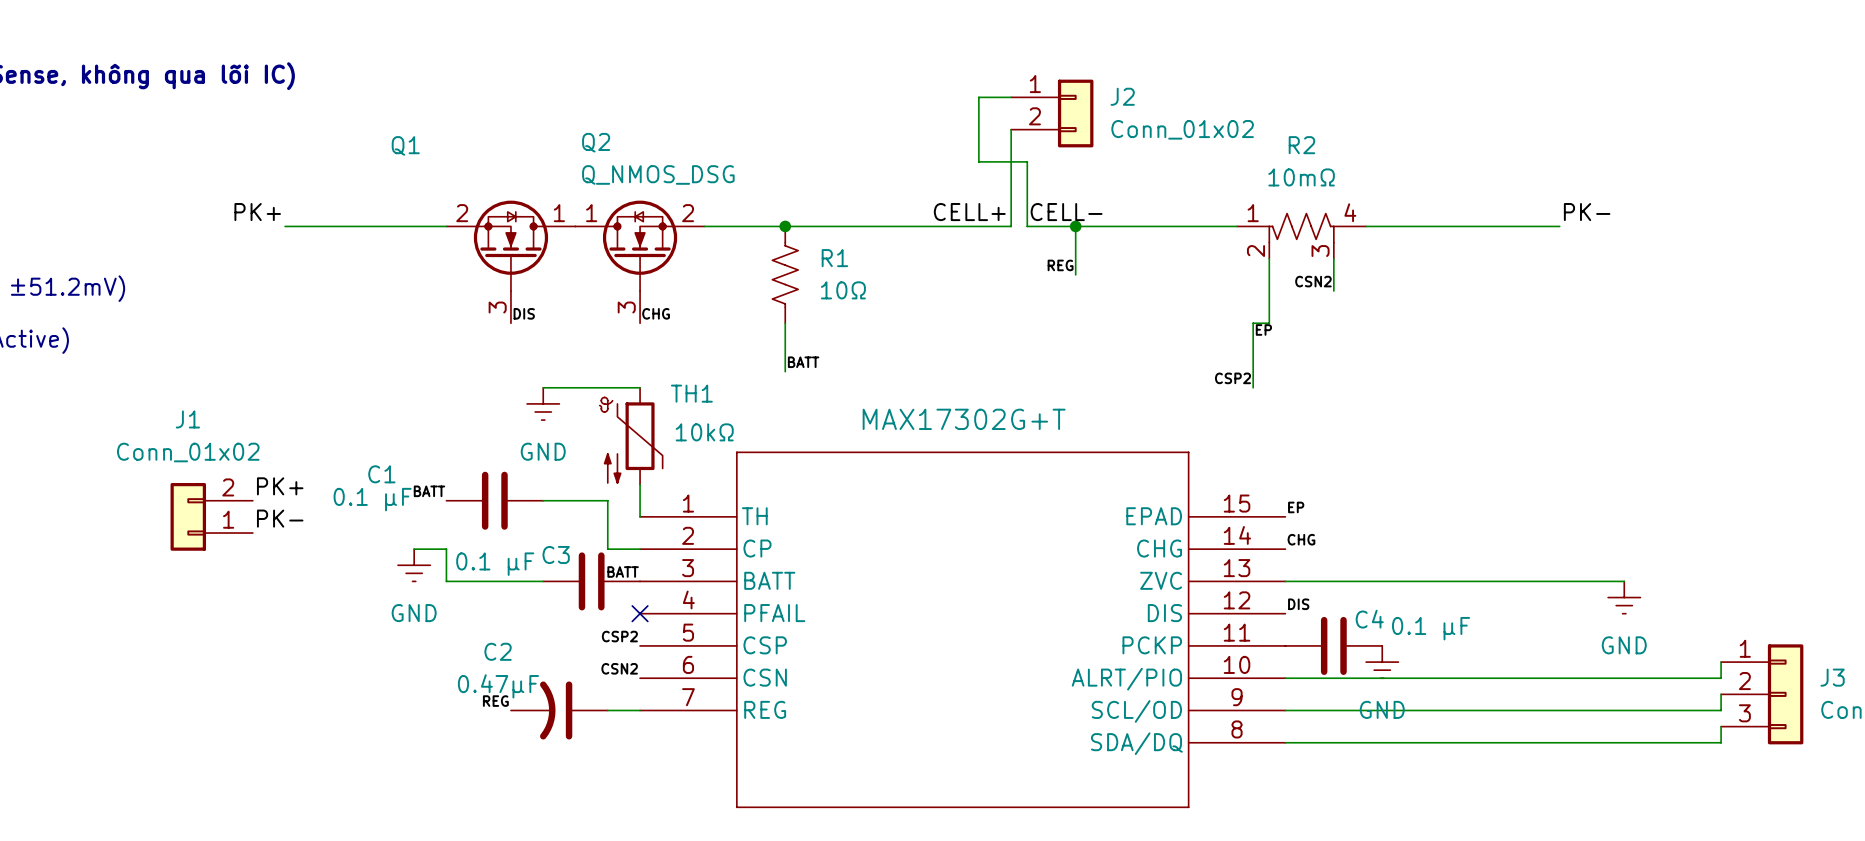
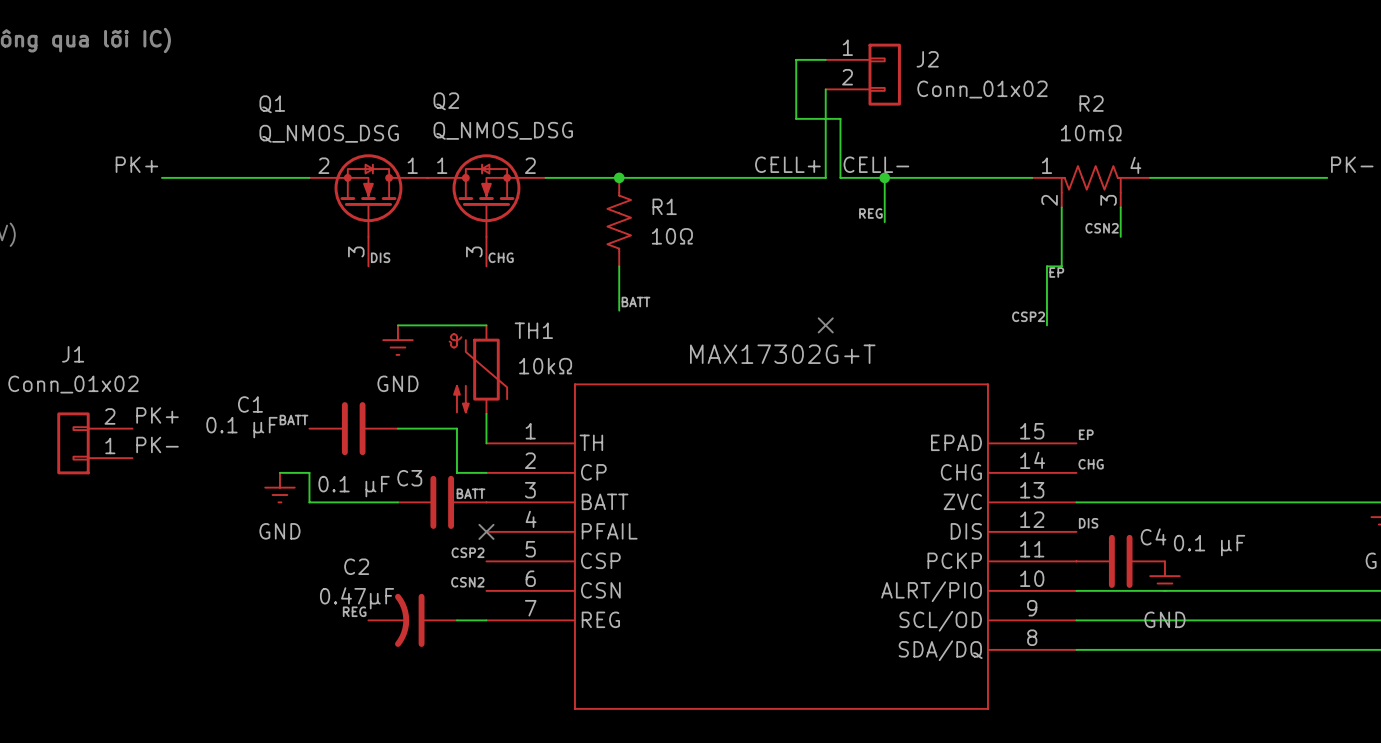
Q1 value: none -> Q_NMOS_DSG (329, 133)
no-connect mark: none -> (825, 325)

